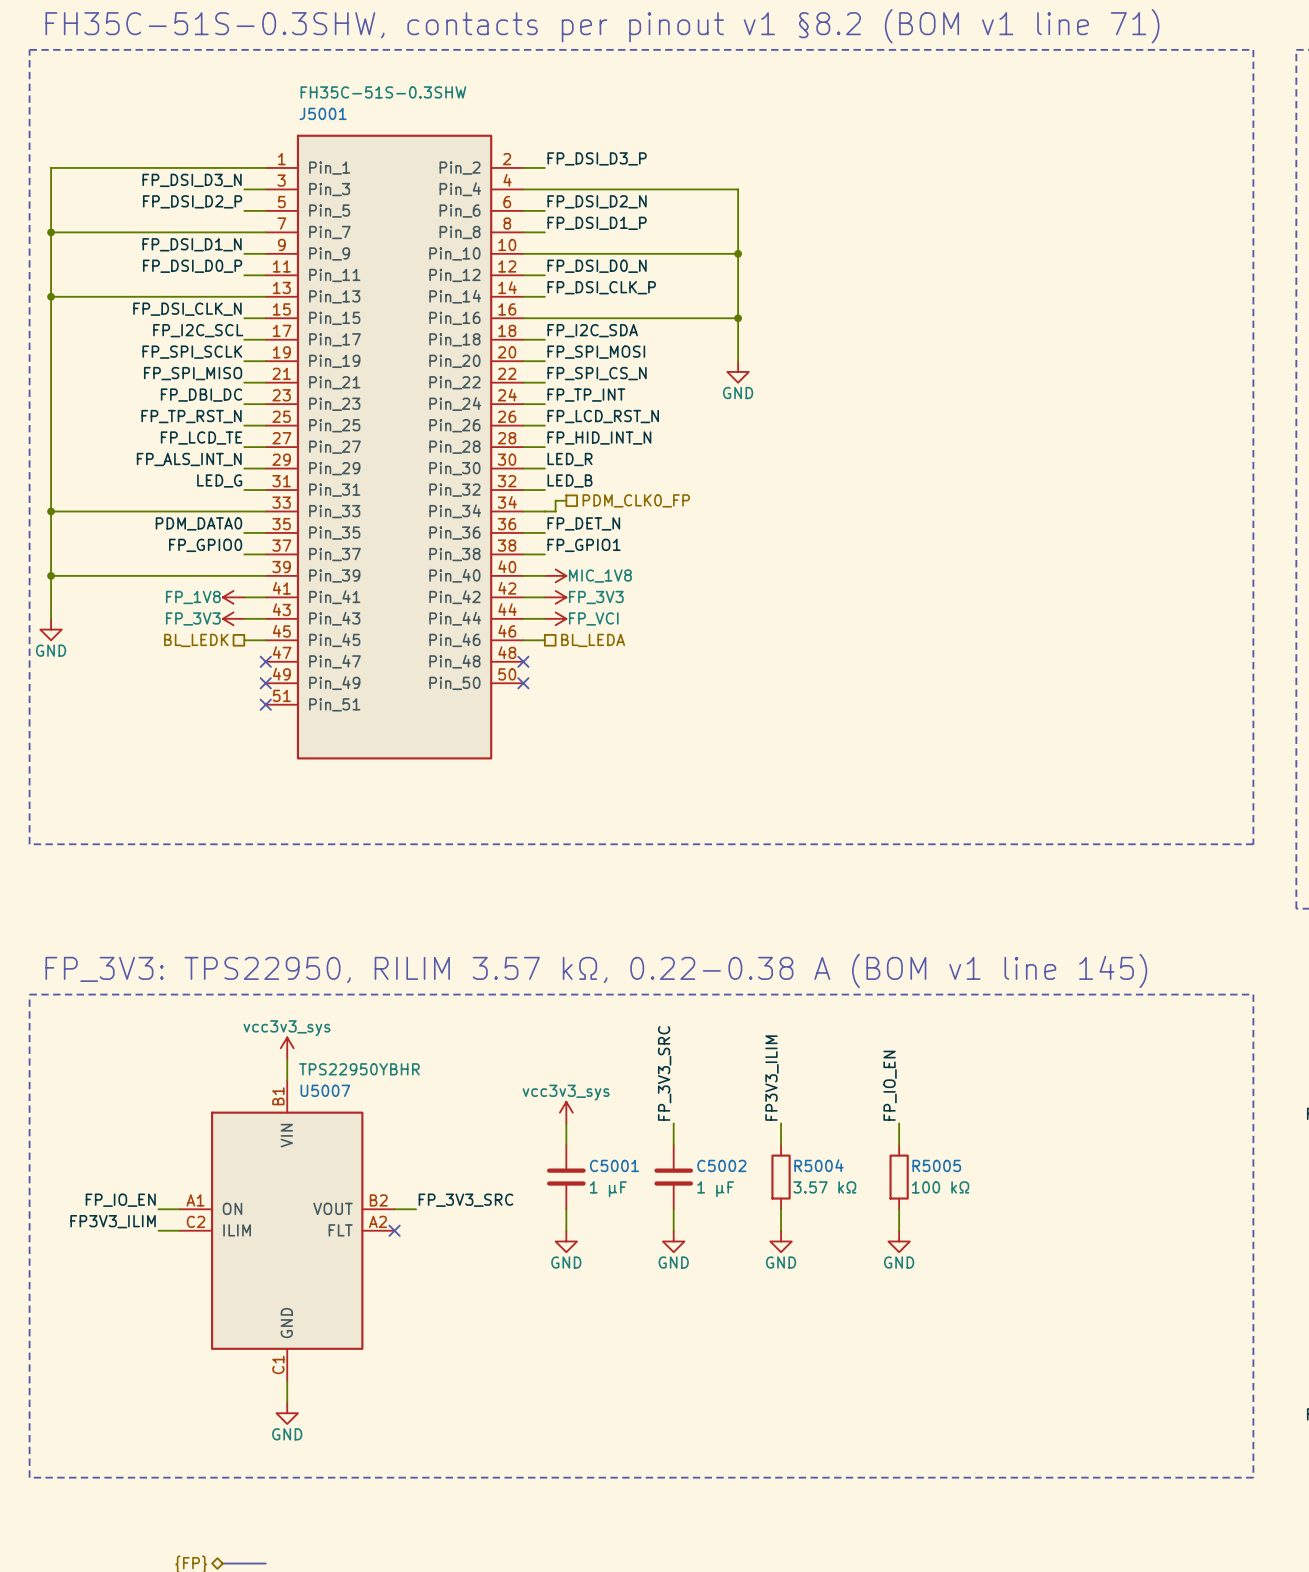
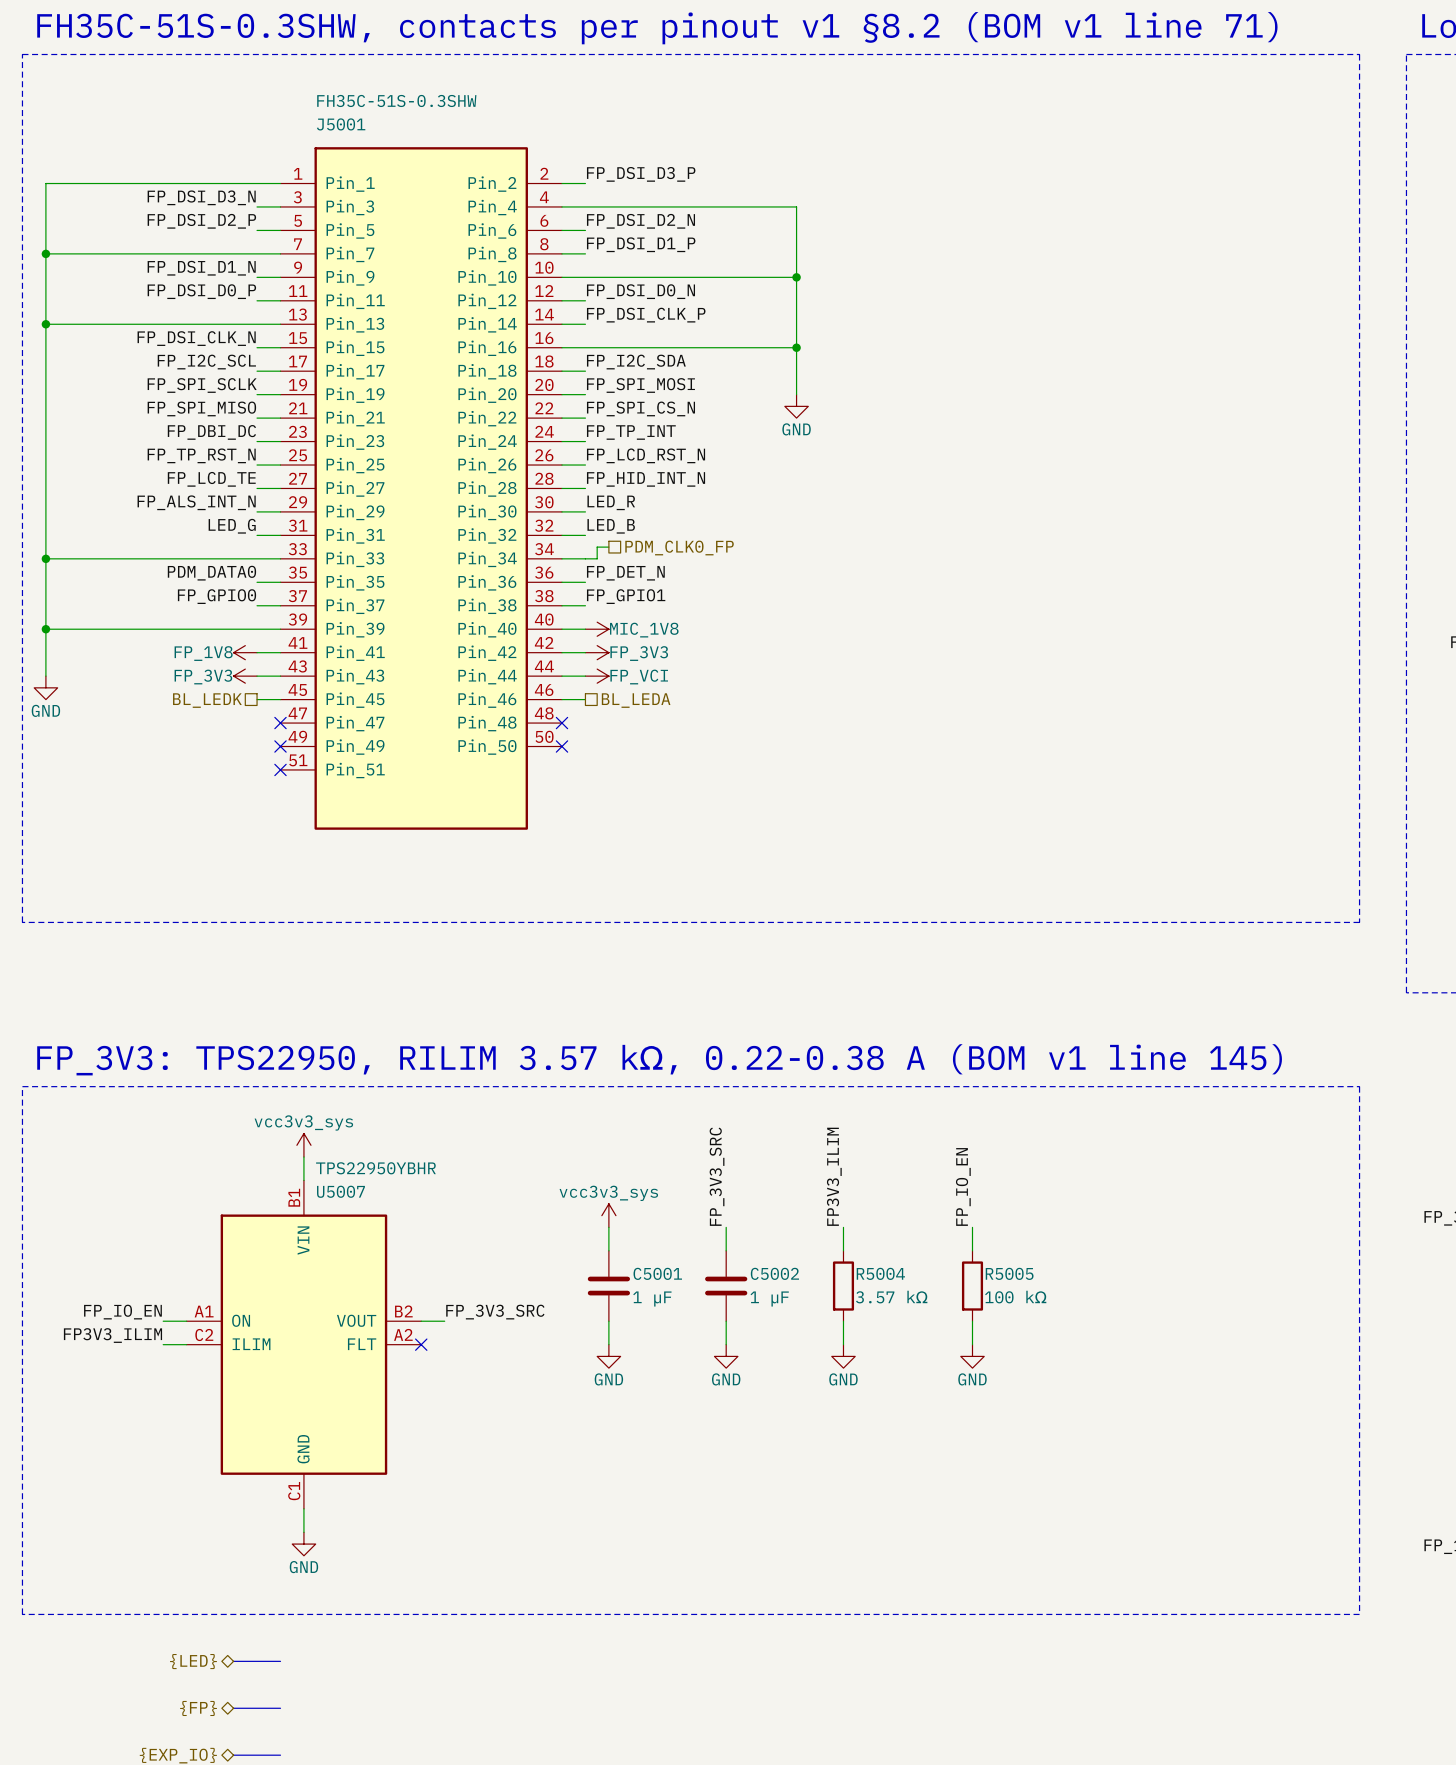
bus: none -> (233, 1661) (280, 1661)
hierarchical label: none -> {LED} (193, 1661)

